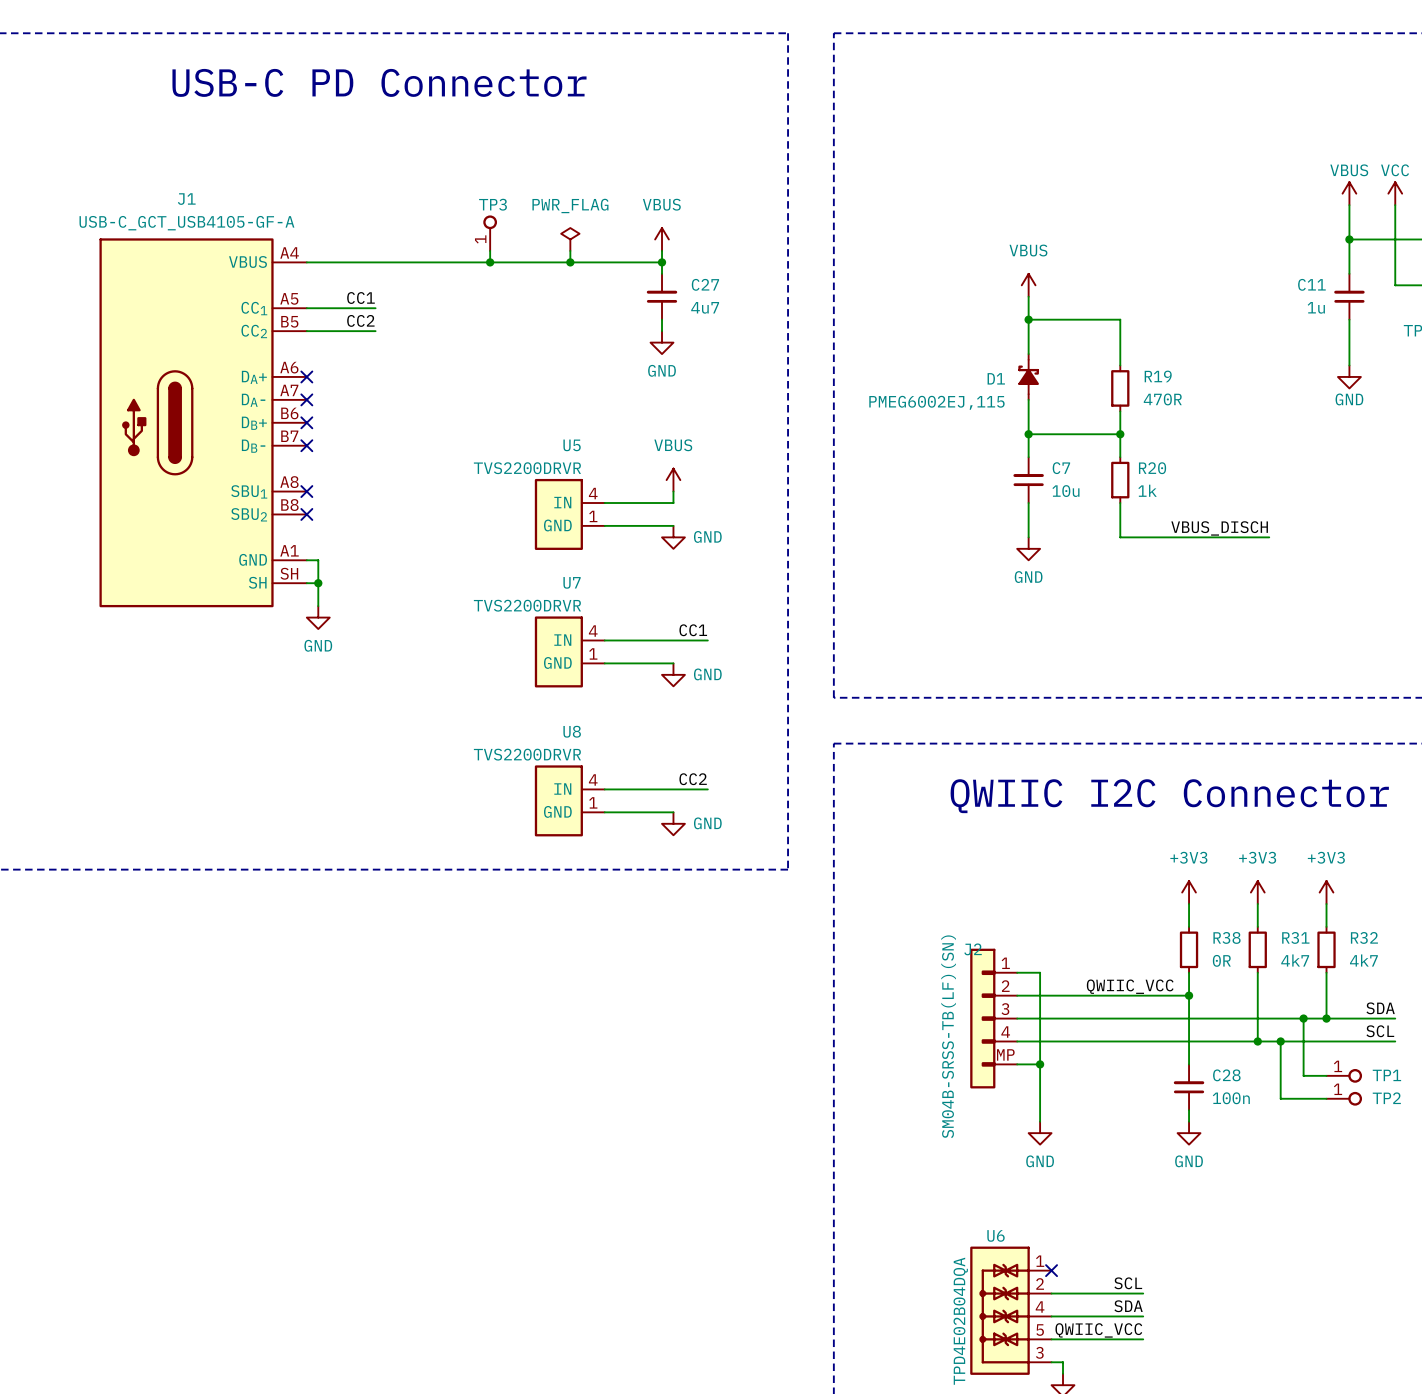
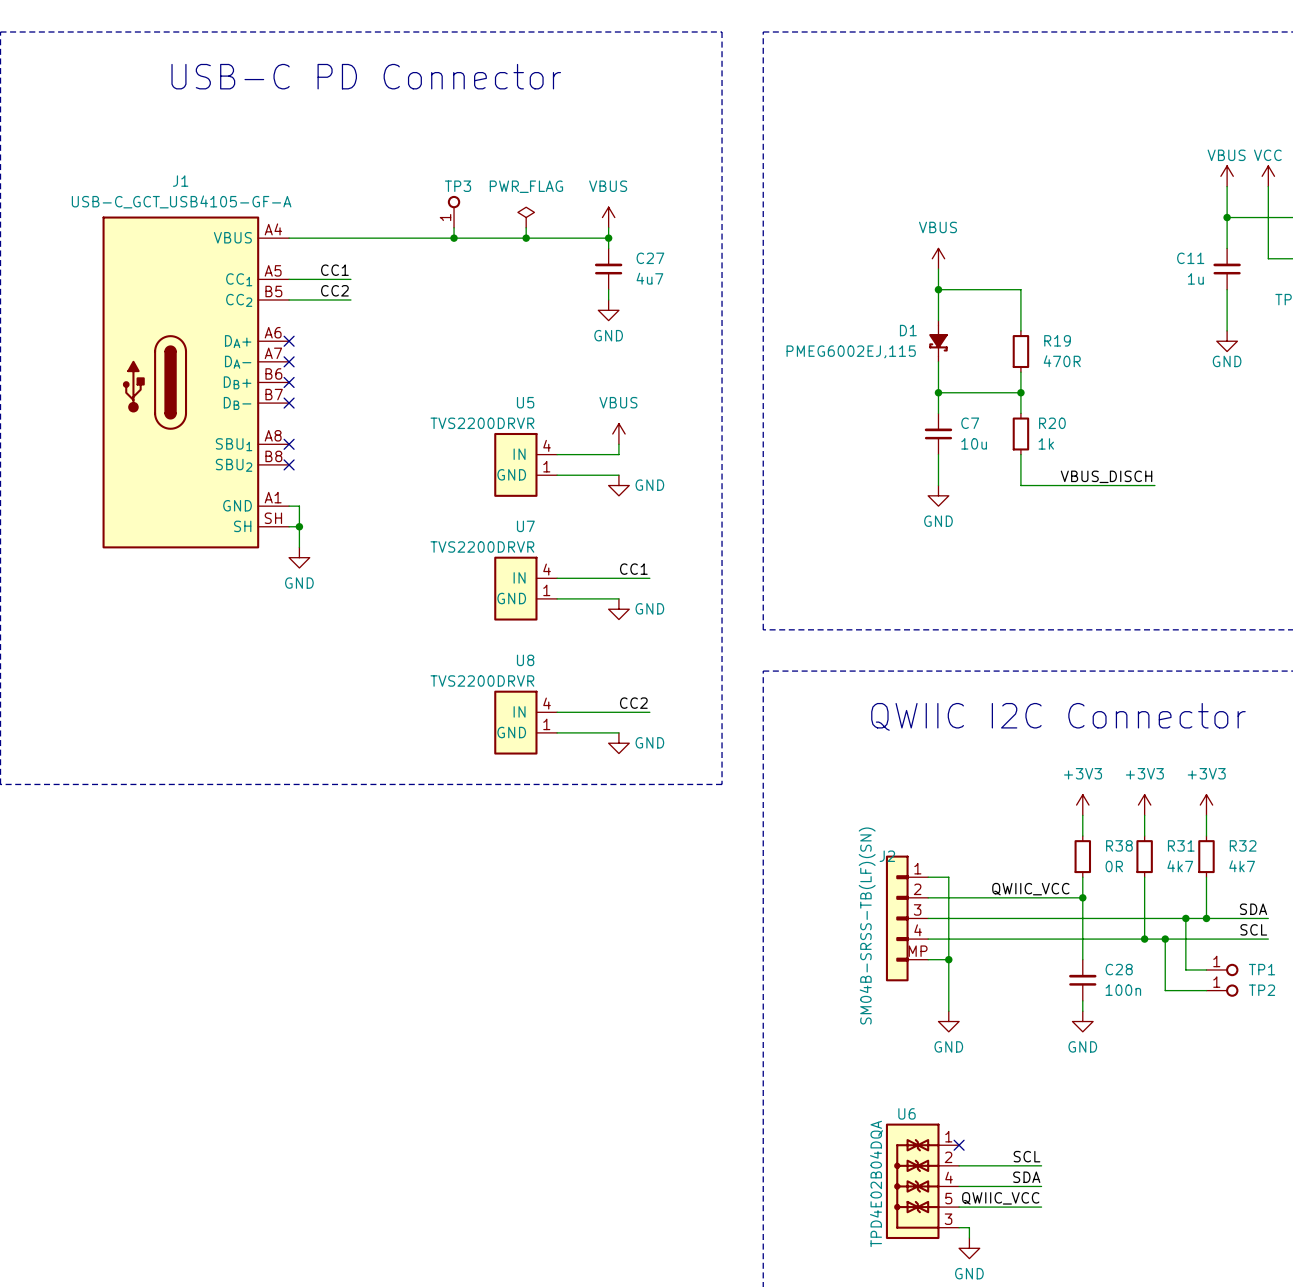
D1 rotation: 0° (1028, 376) -> 180° (938, 341)
D1 value position: PMEG6002EJ,115 (936, 402) -> PMEG6002EJ,115 (851, 351)

